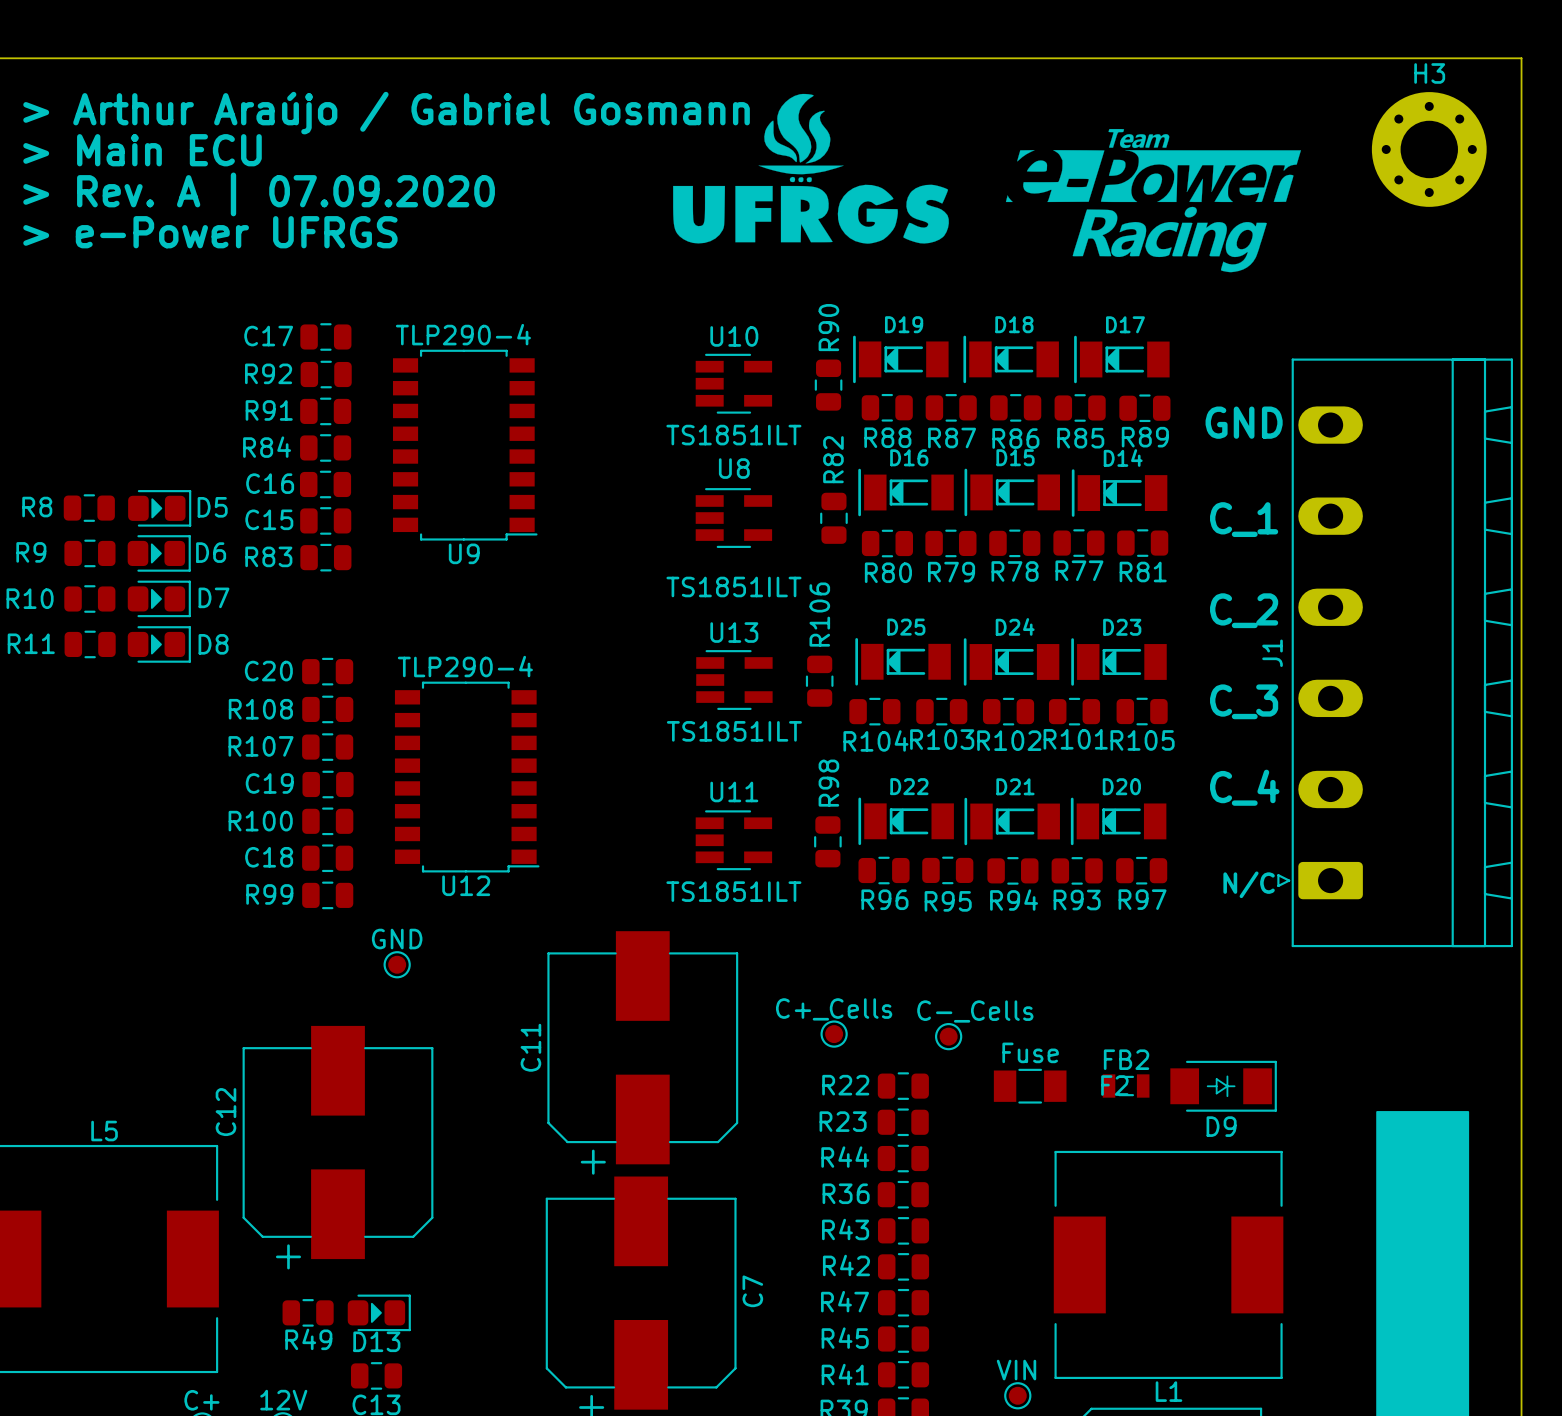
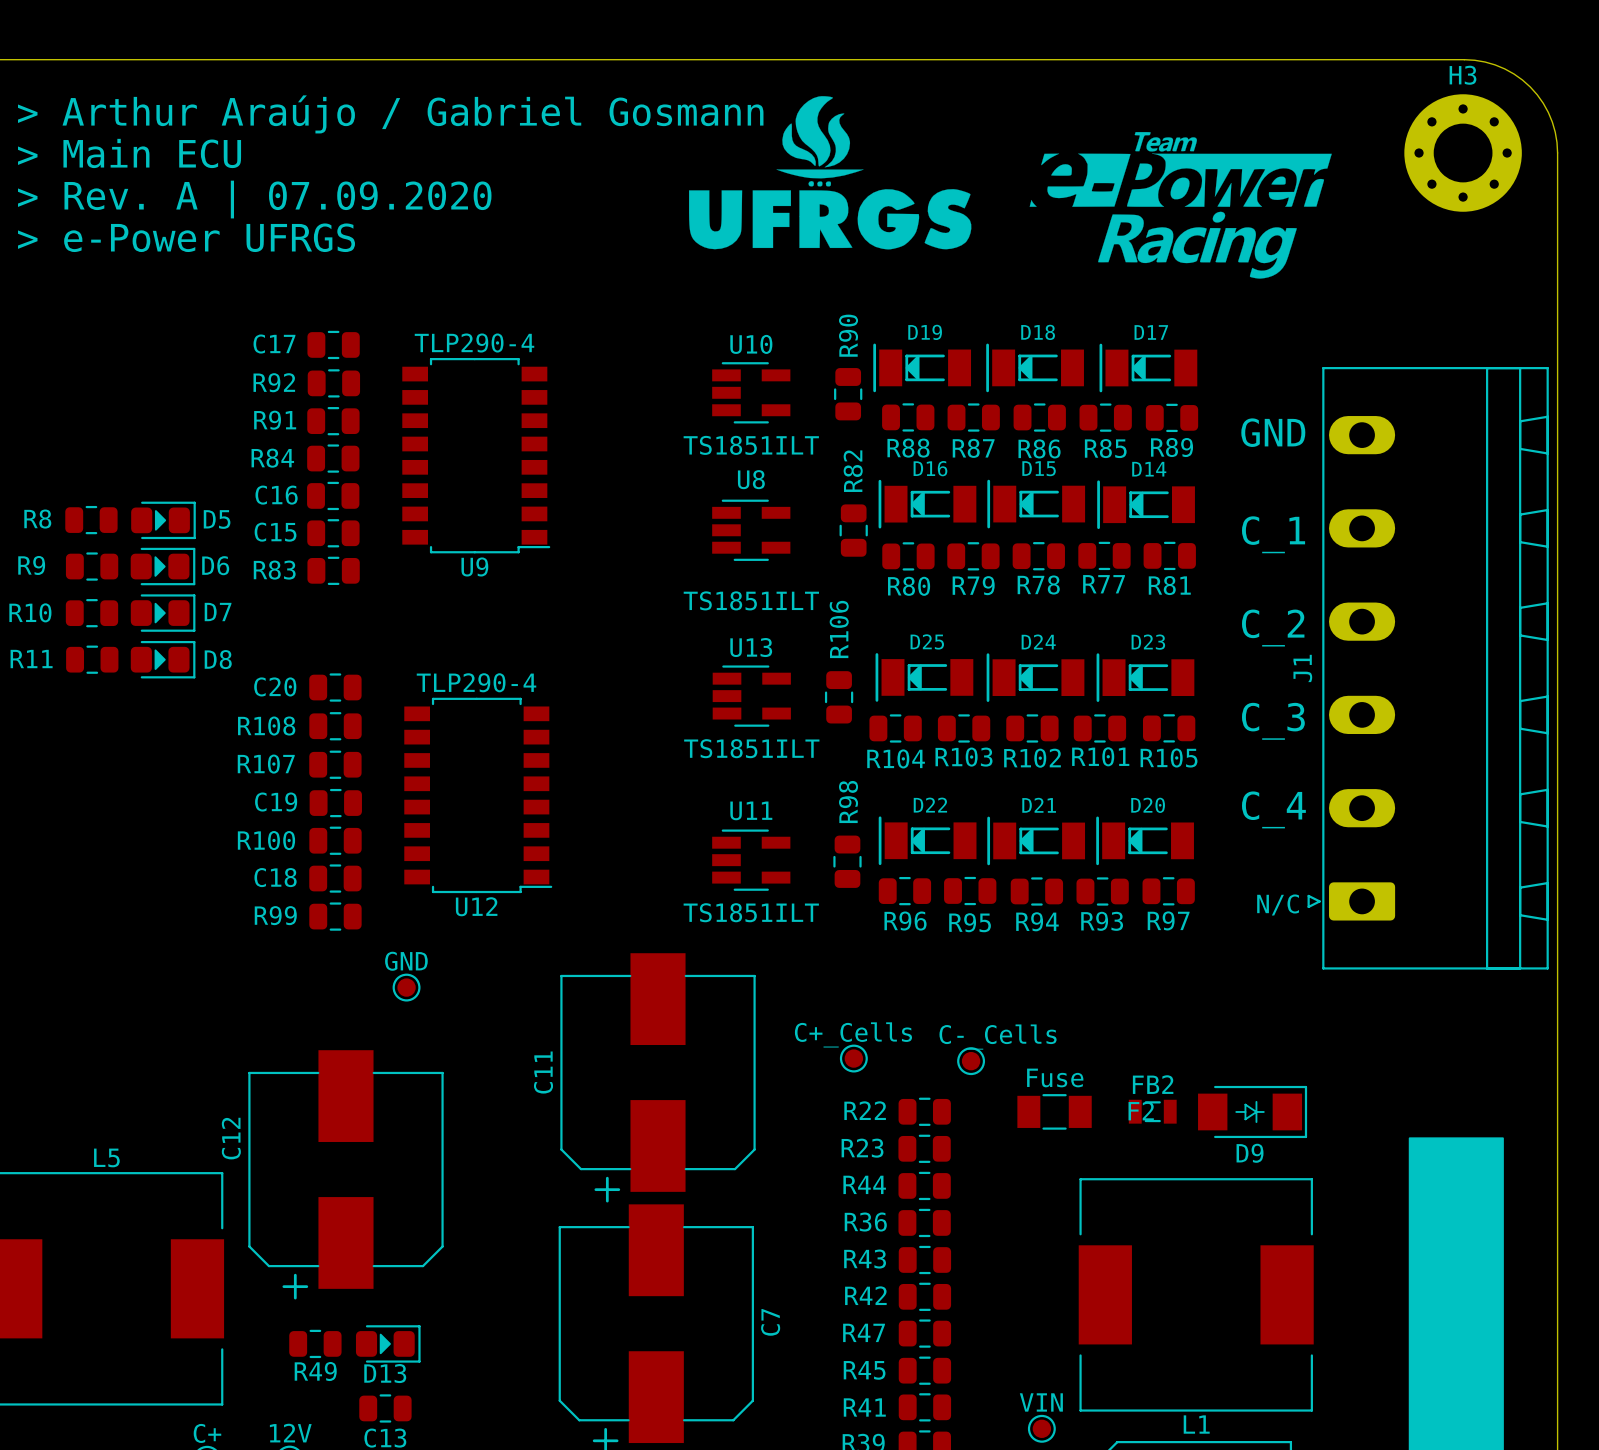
board edge: (1430, 58) (1521, 58) (1521, 149) -> (1464, 59) (1485, 62) (1504, 68) (1530, 86) (1543, 103) (1552, 122) (1557, 152)

